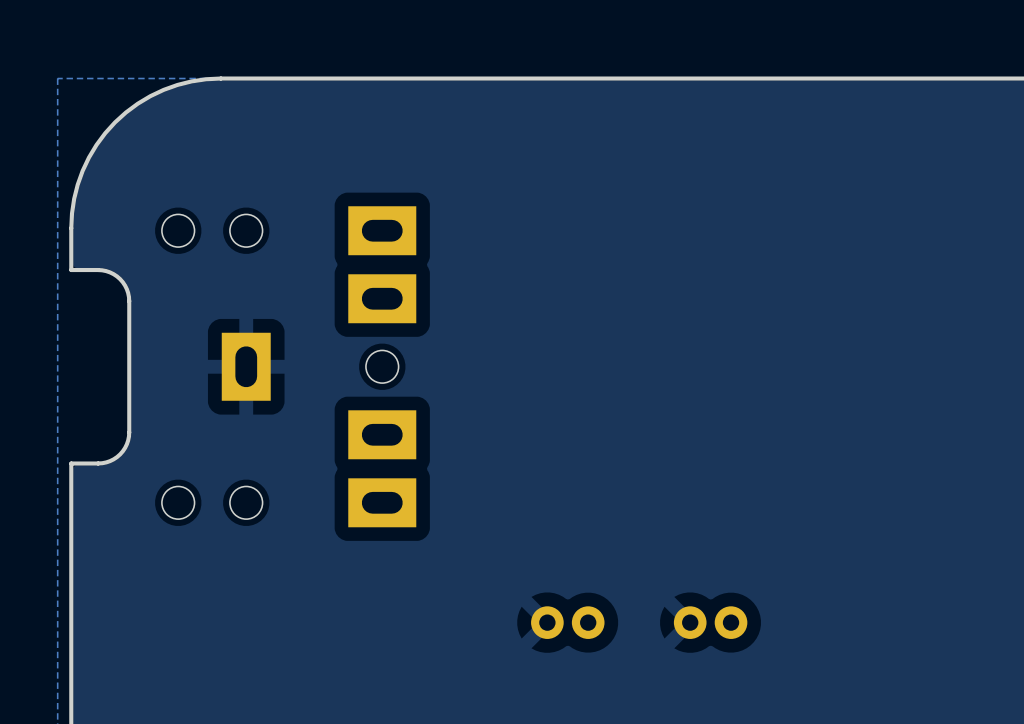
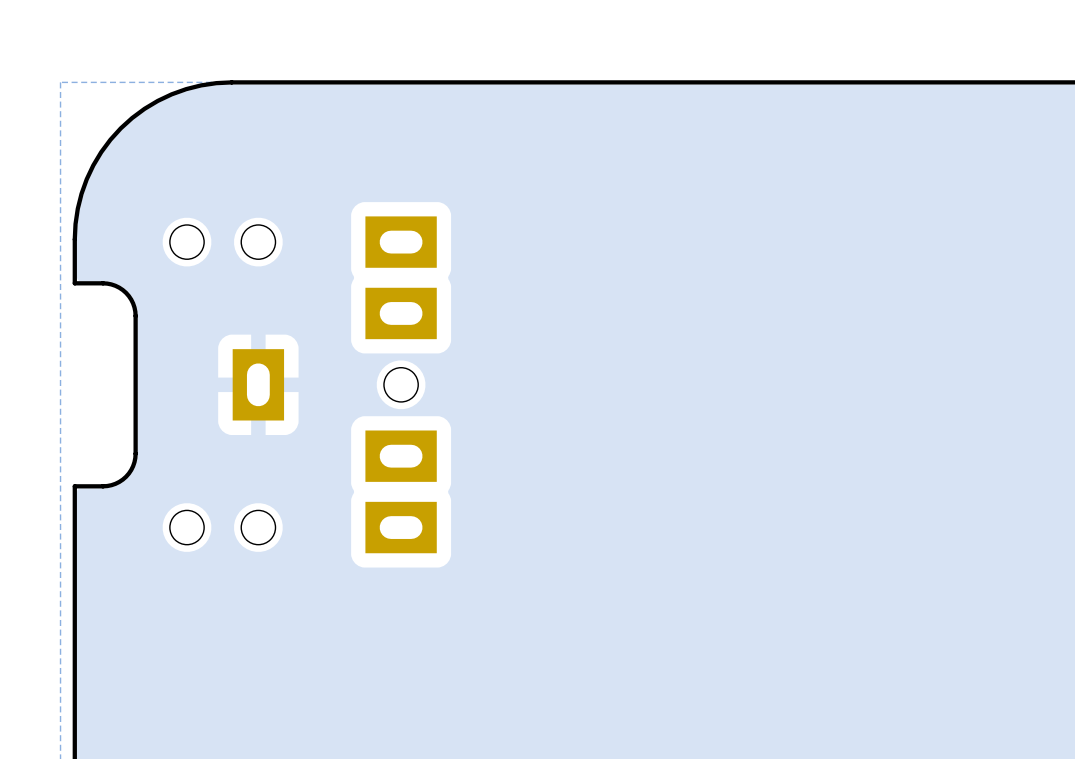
part: (567, 622) -> none
part: (710, 622) -> none

